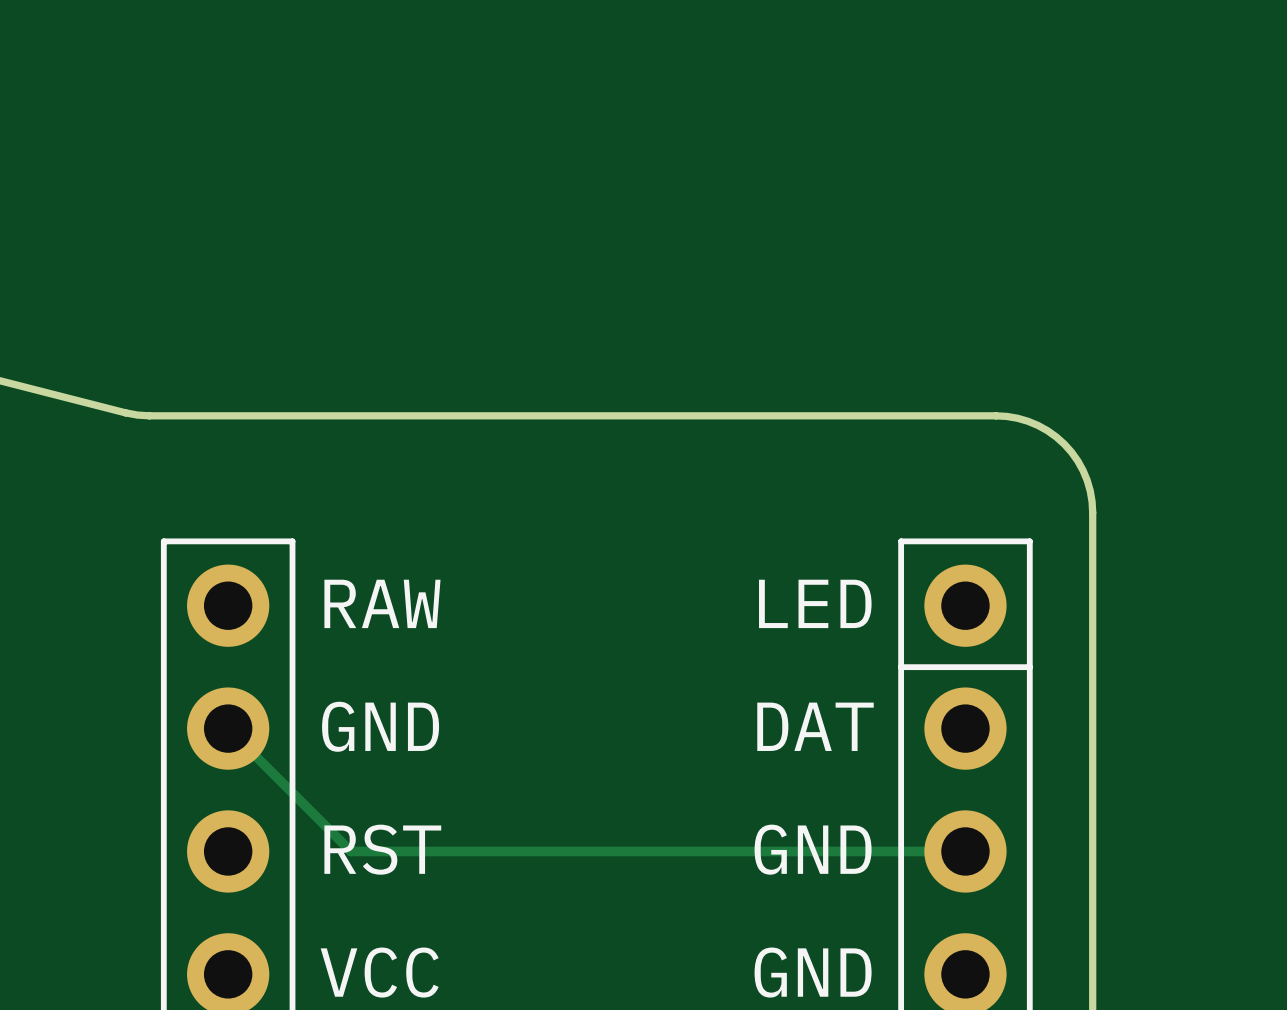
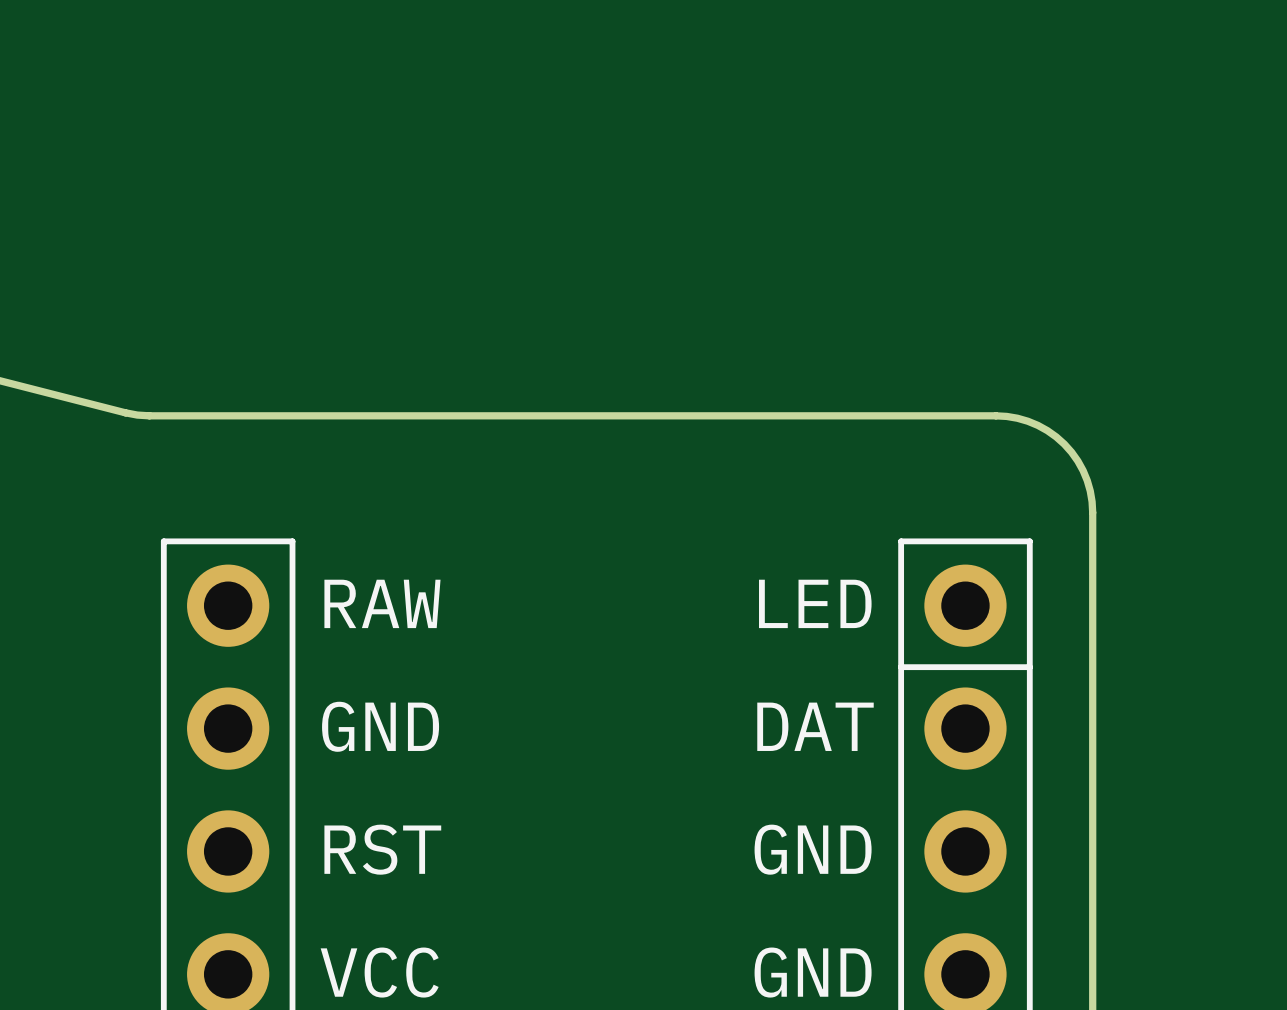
track: (228, 728) (351, 851) (965, 851) -> none

